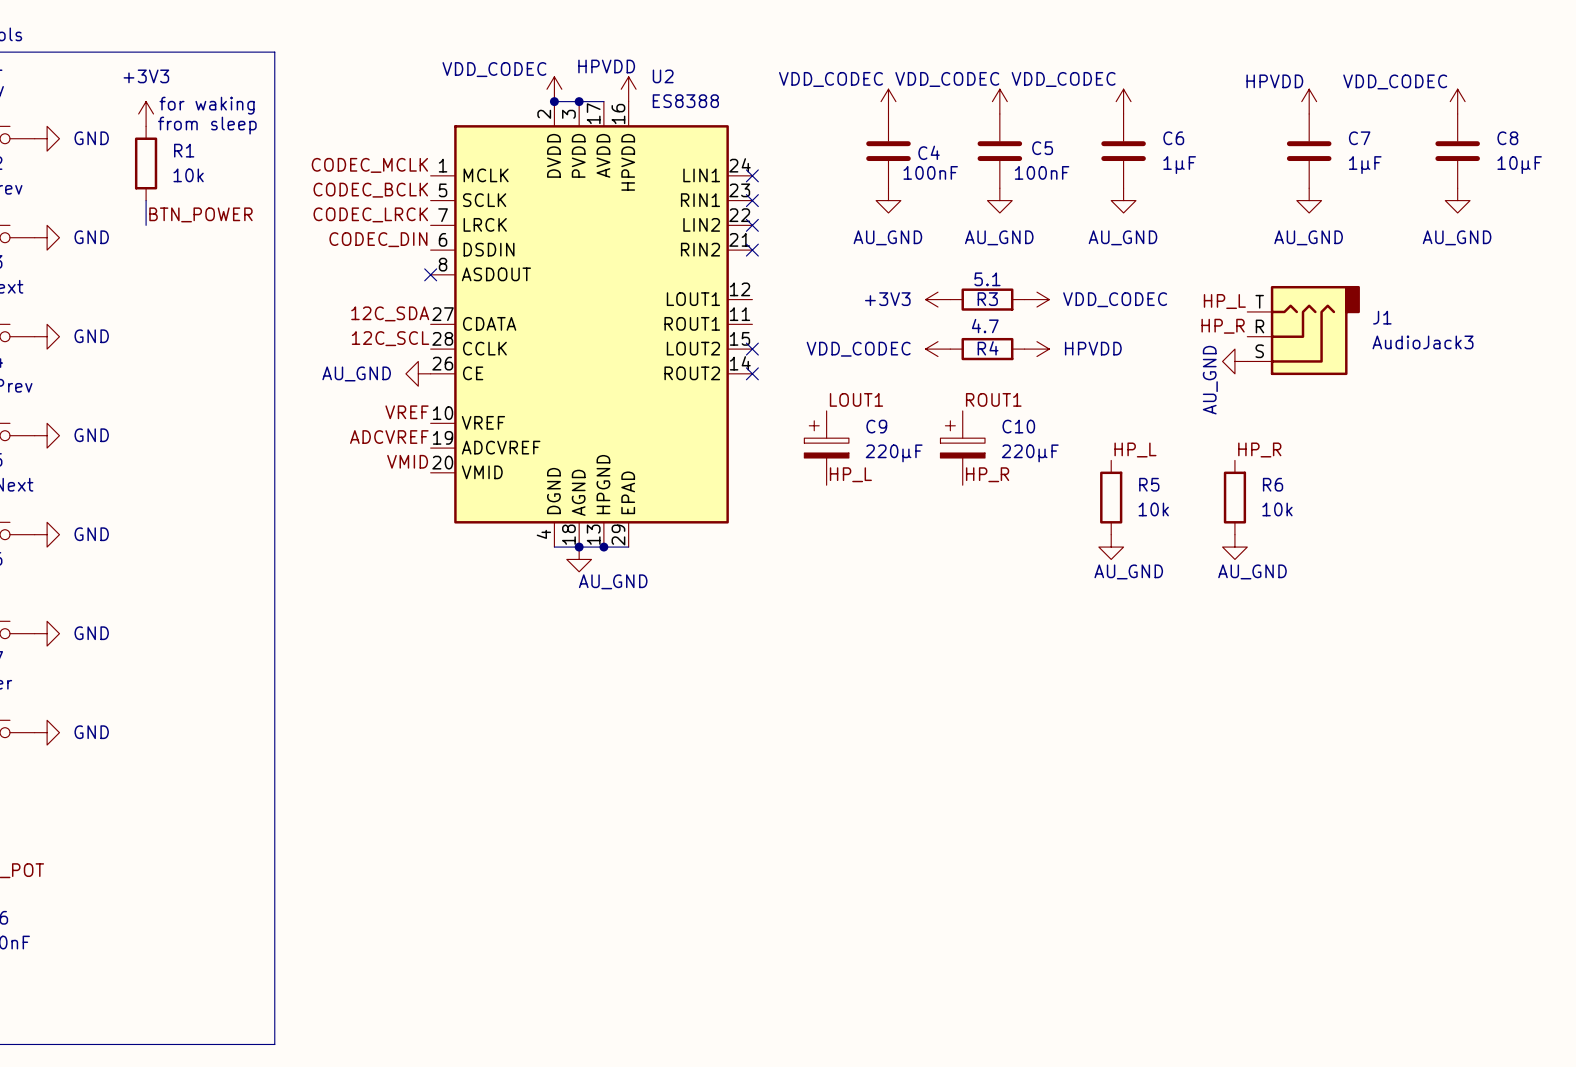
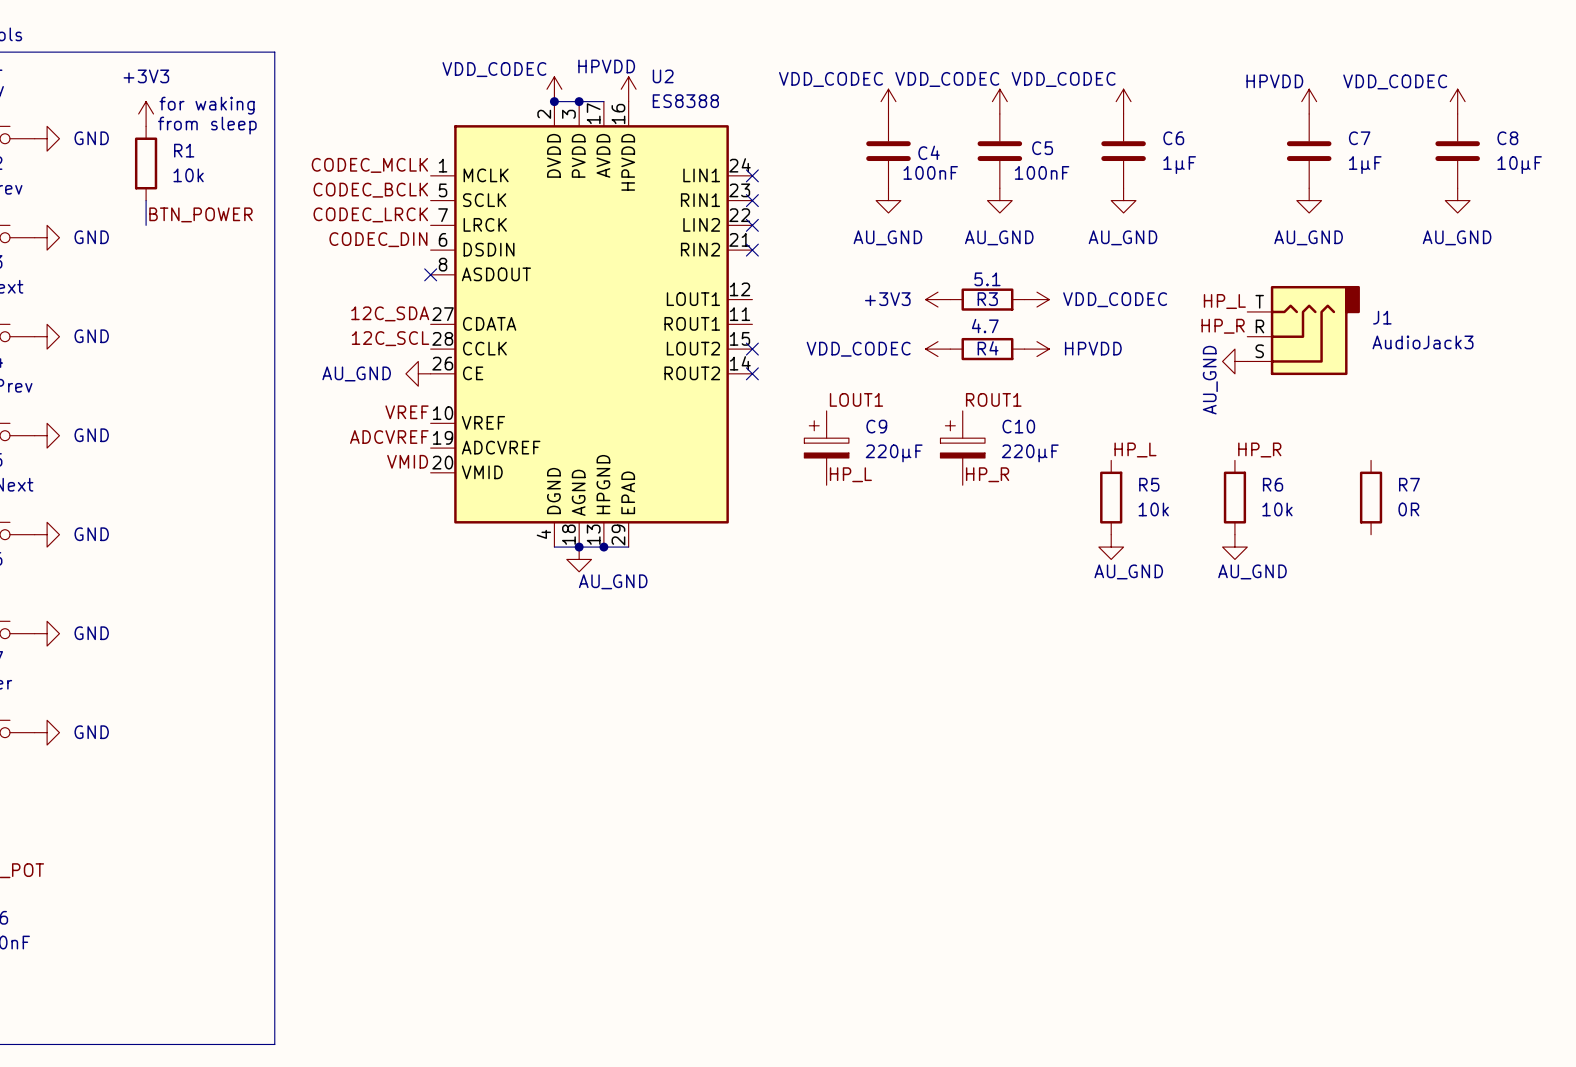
R7: none -> 0R (1371, 497)

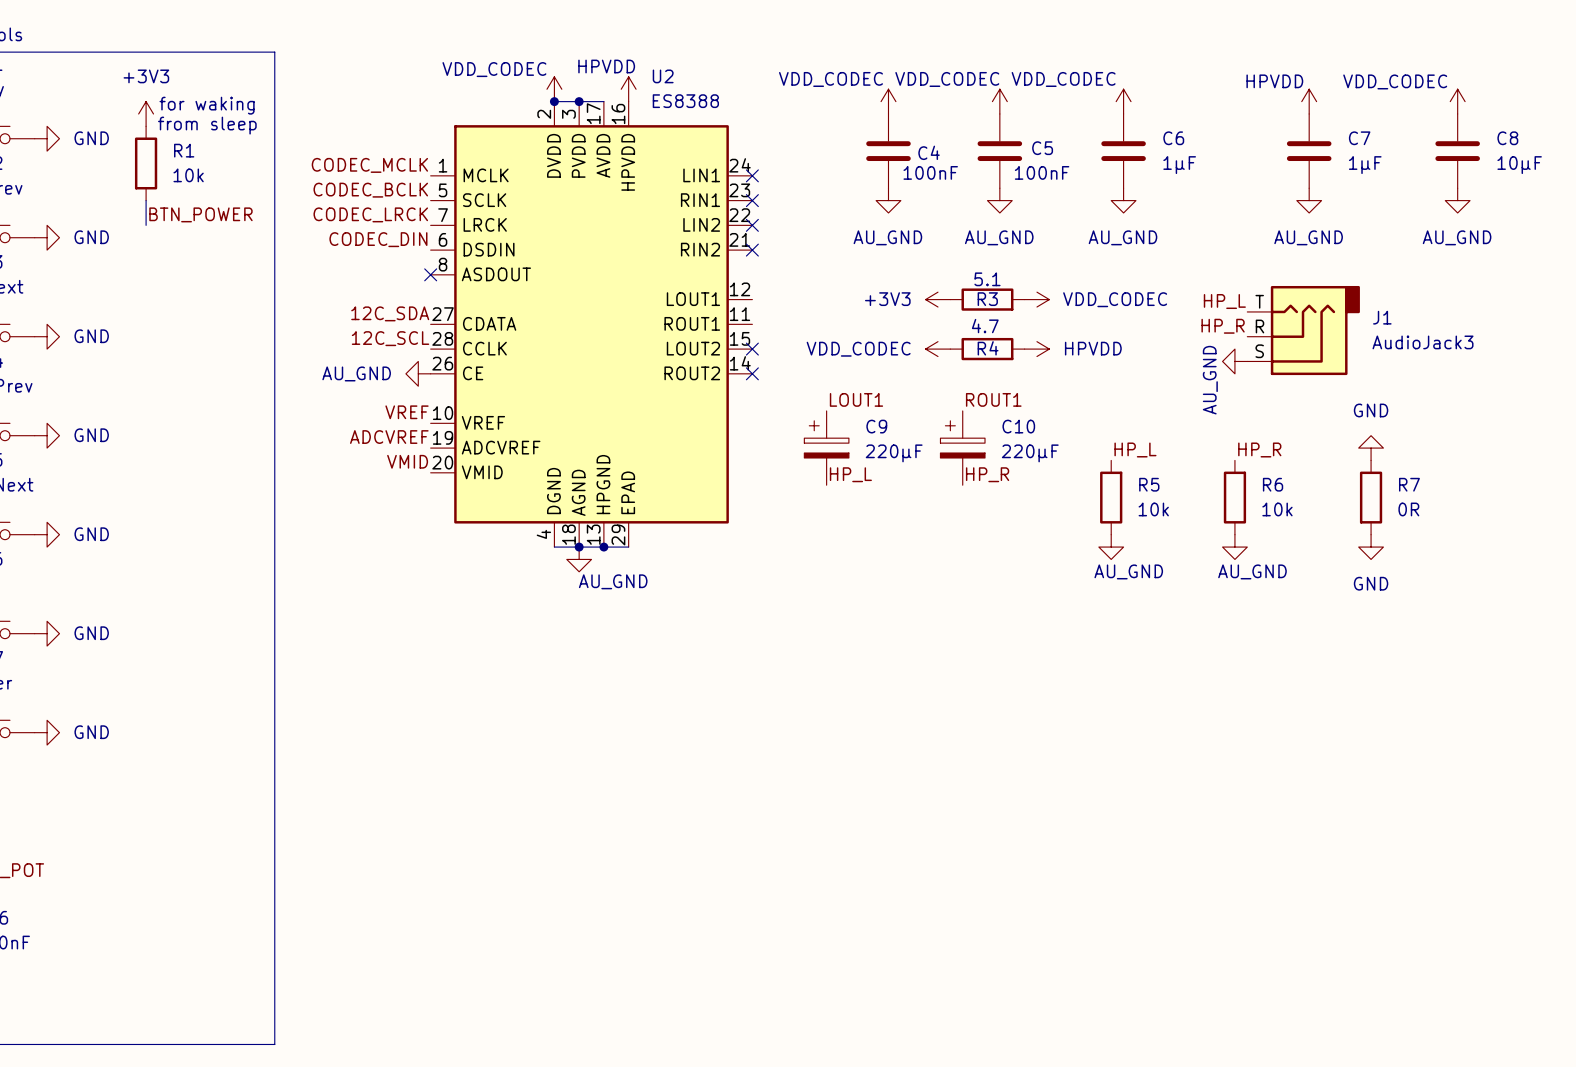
power symbol: none -> GND (1371, 448)
power symbol: none -> GND (1371, 547)

